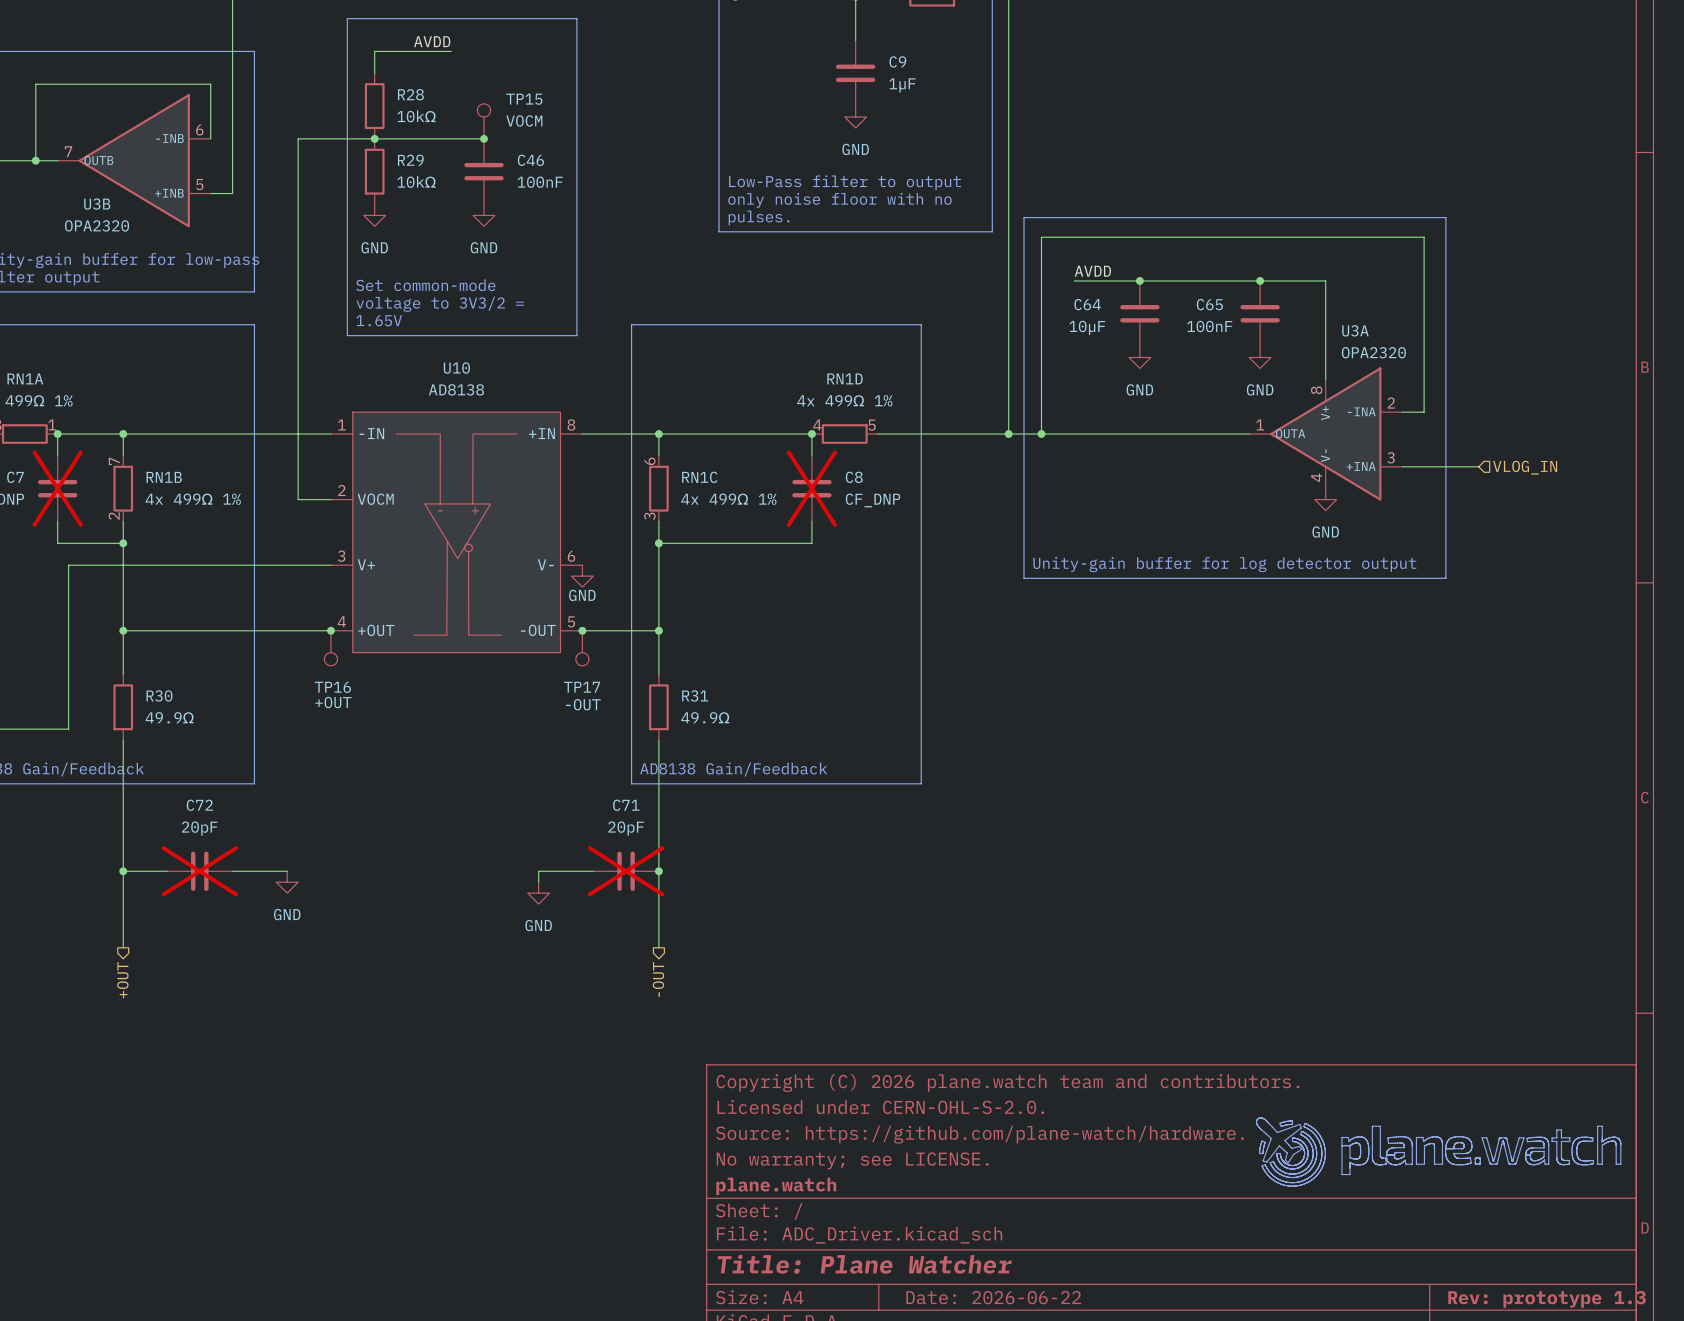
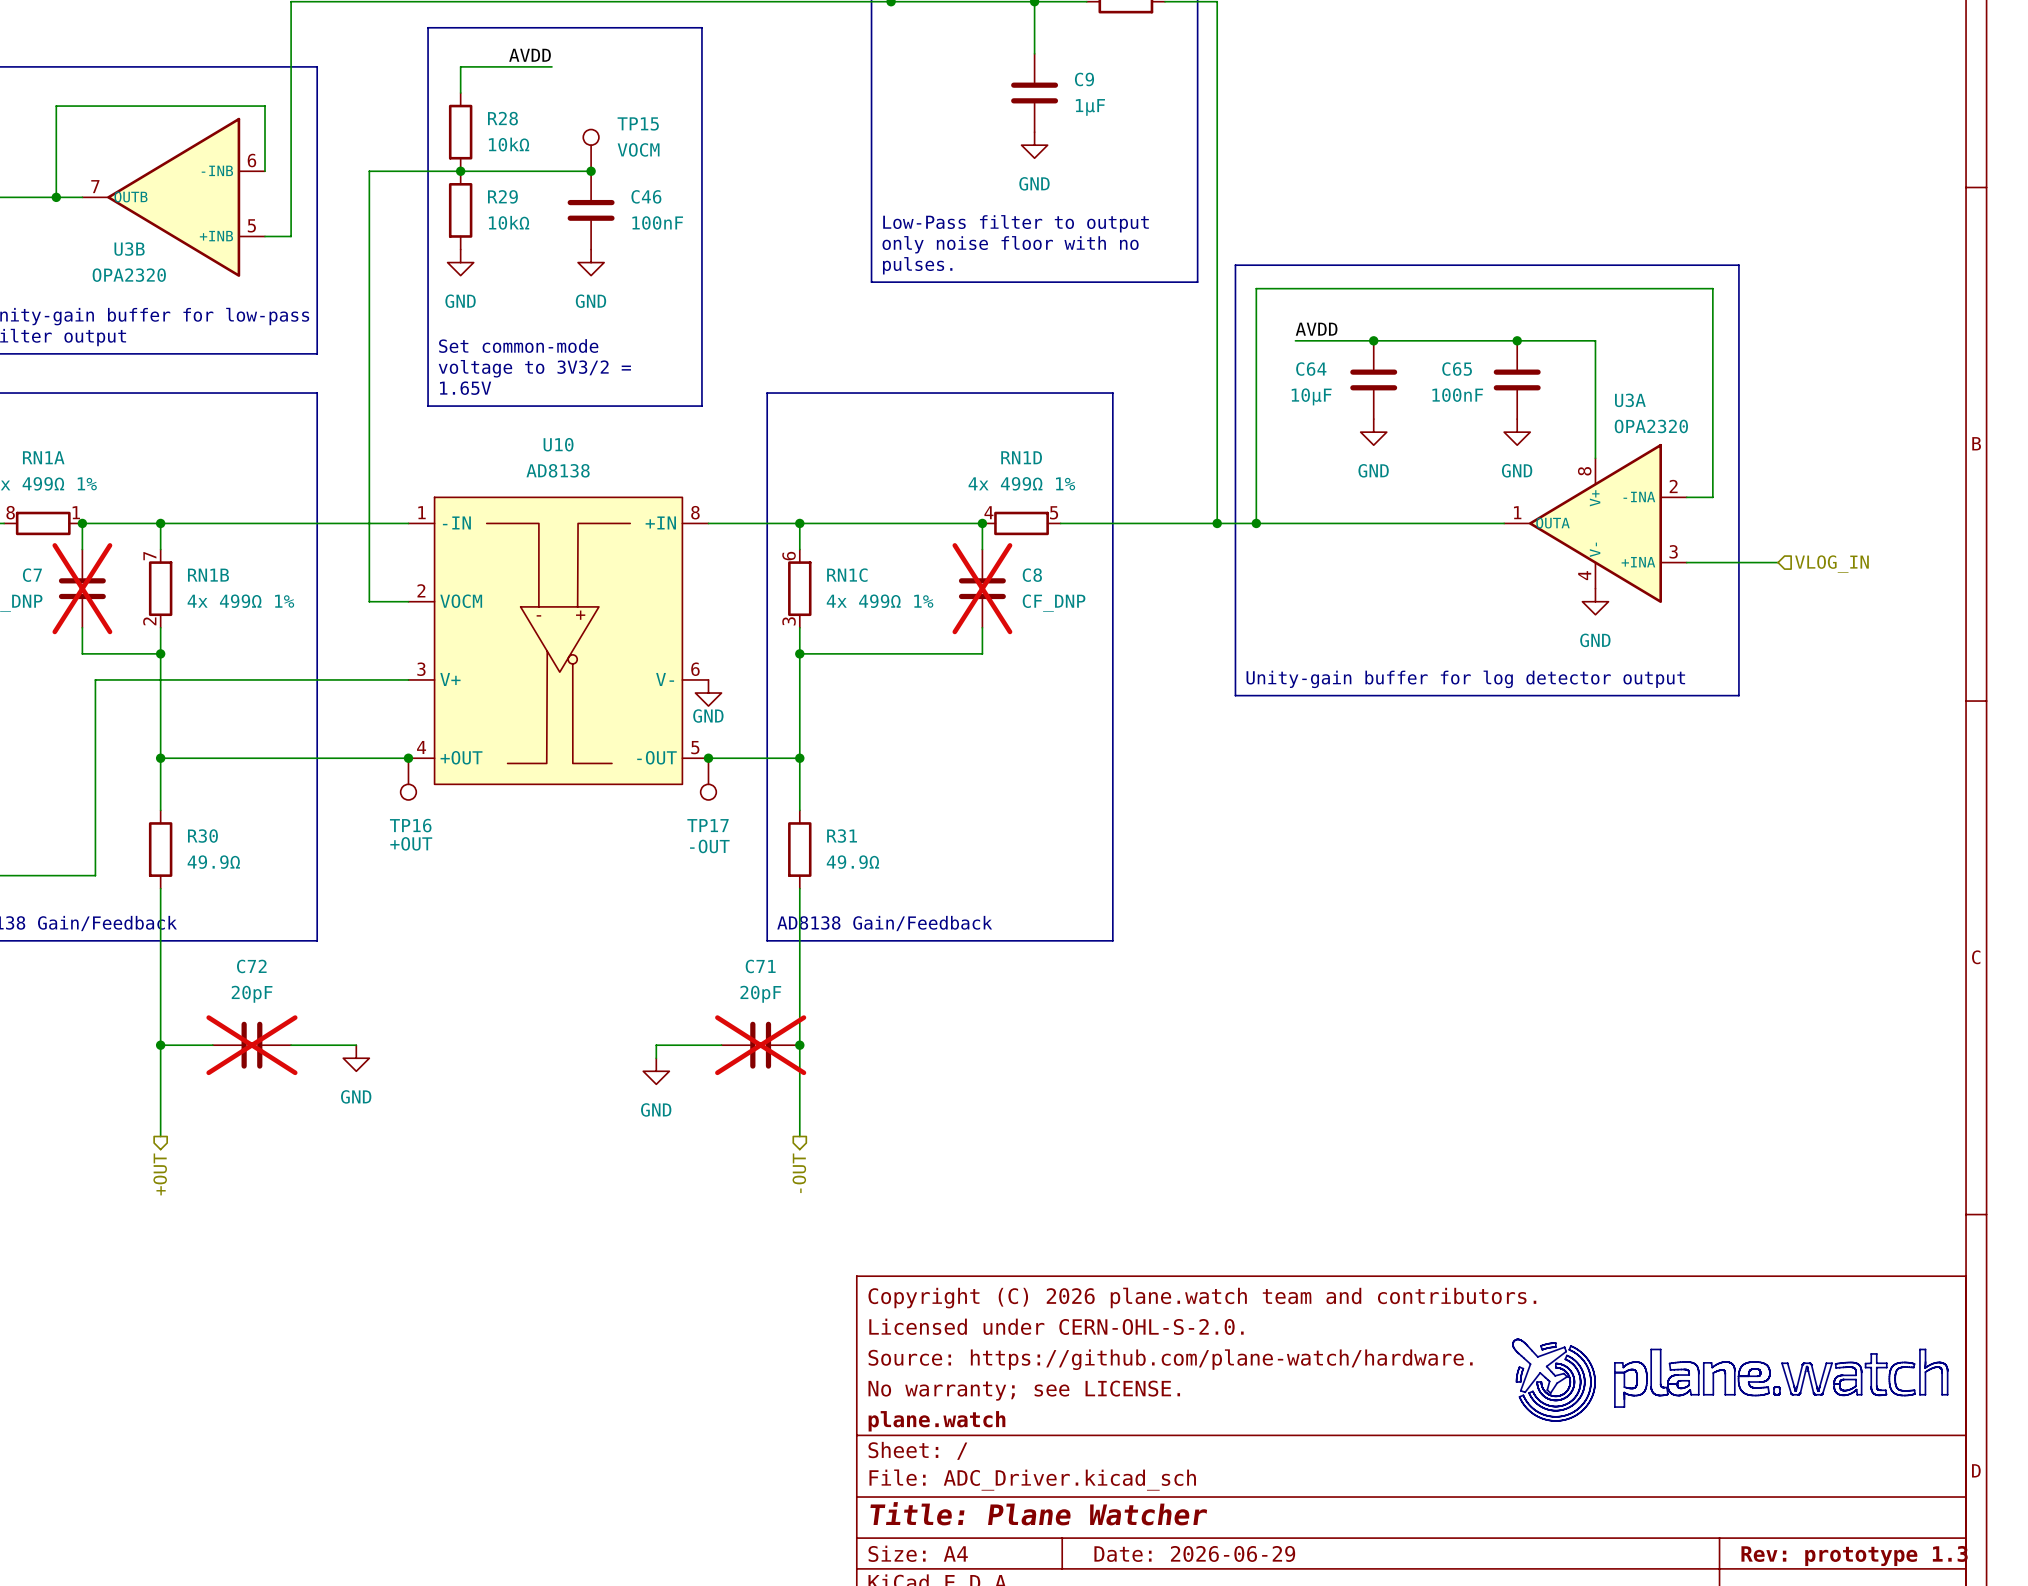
title block: Date: 2026-06-22 (993, 1297) -> Date: 2026-06-29 (1194, 1553)

